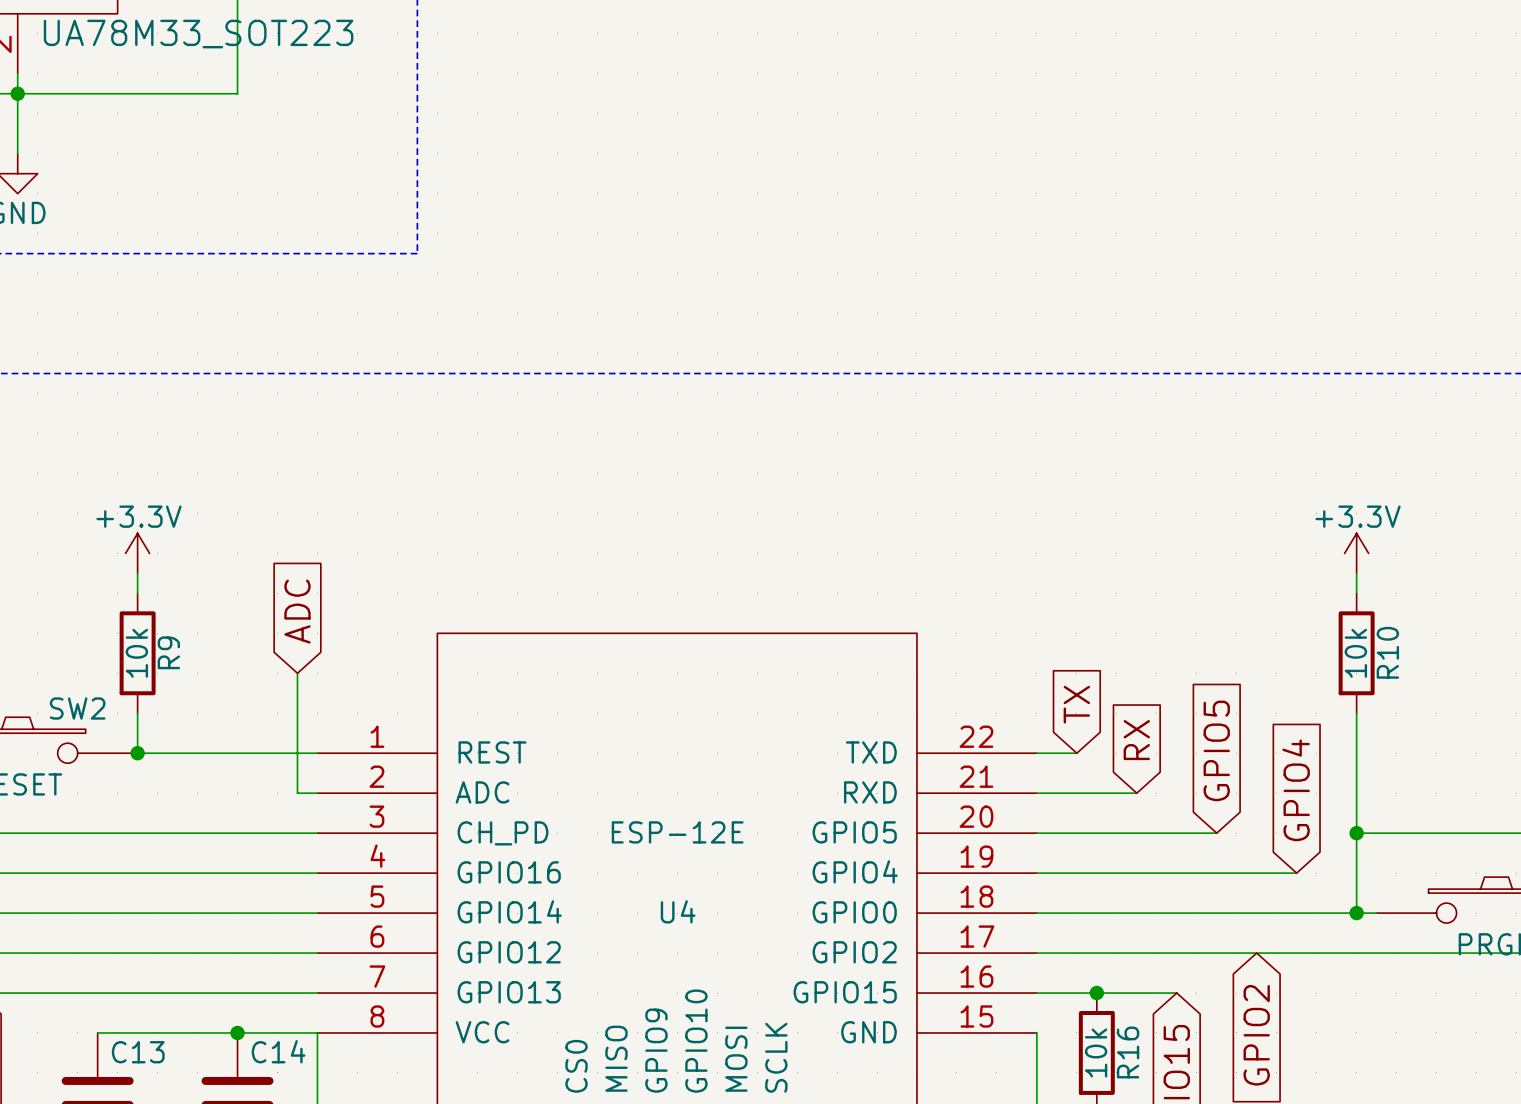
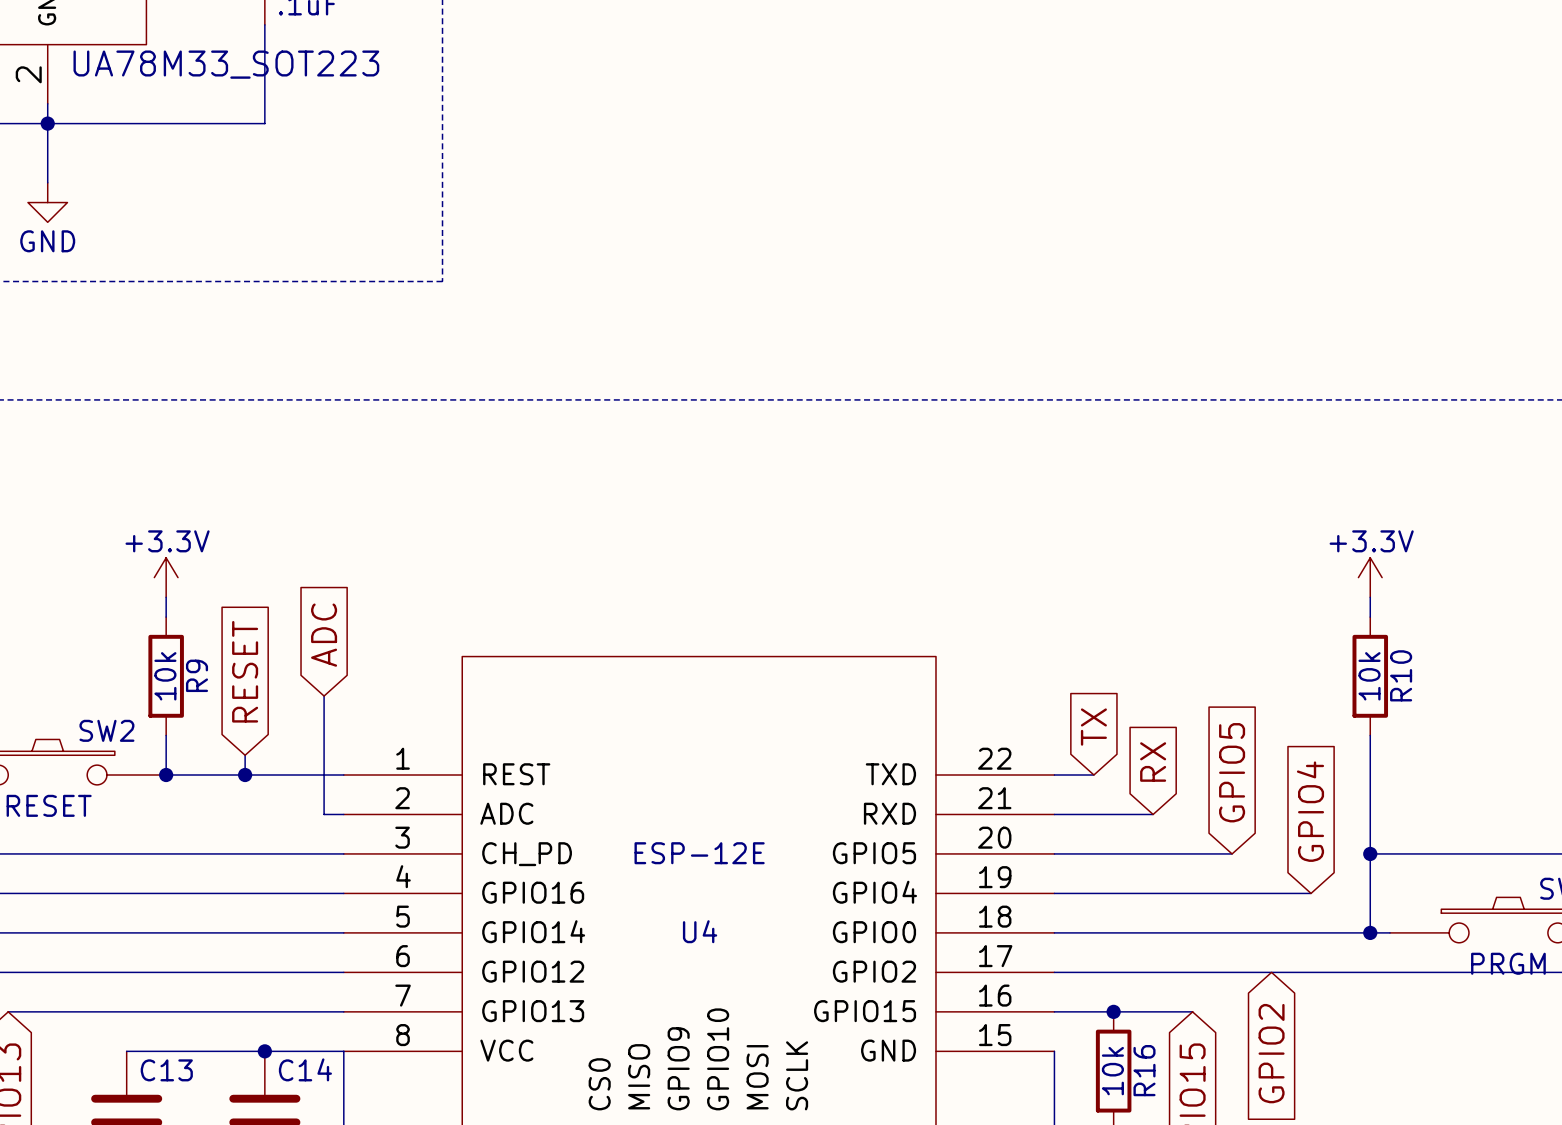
global label: none -> RESET (245, 671)
wire: none -> (245, 755) (245, 775)
junction: none -> (245, 775)

